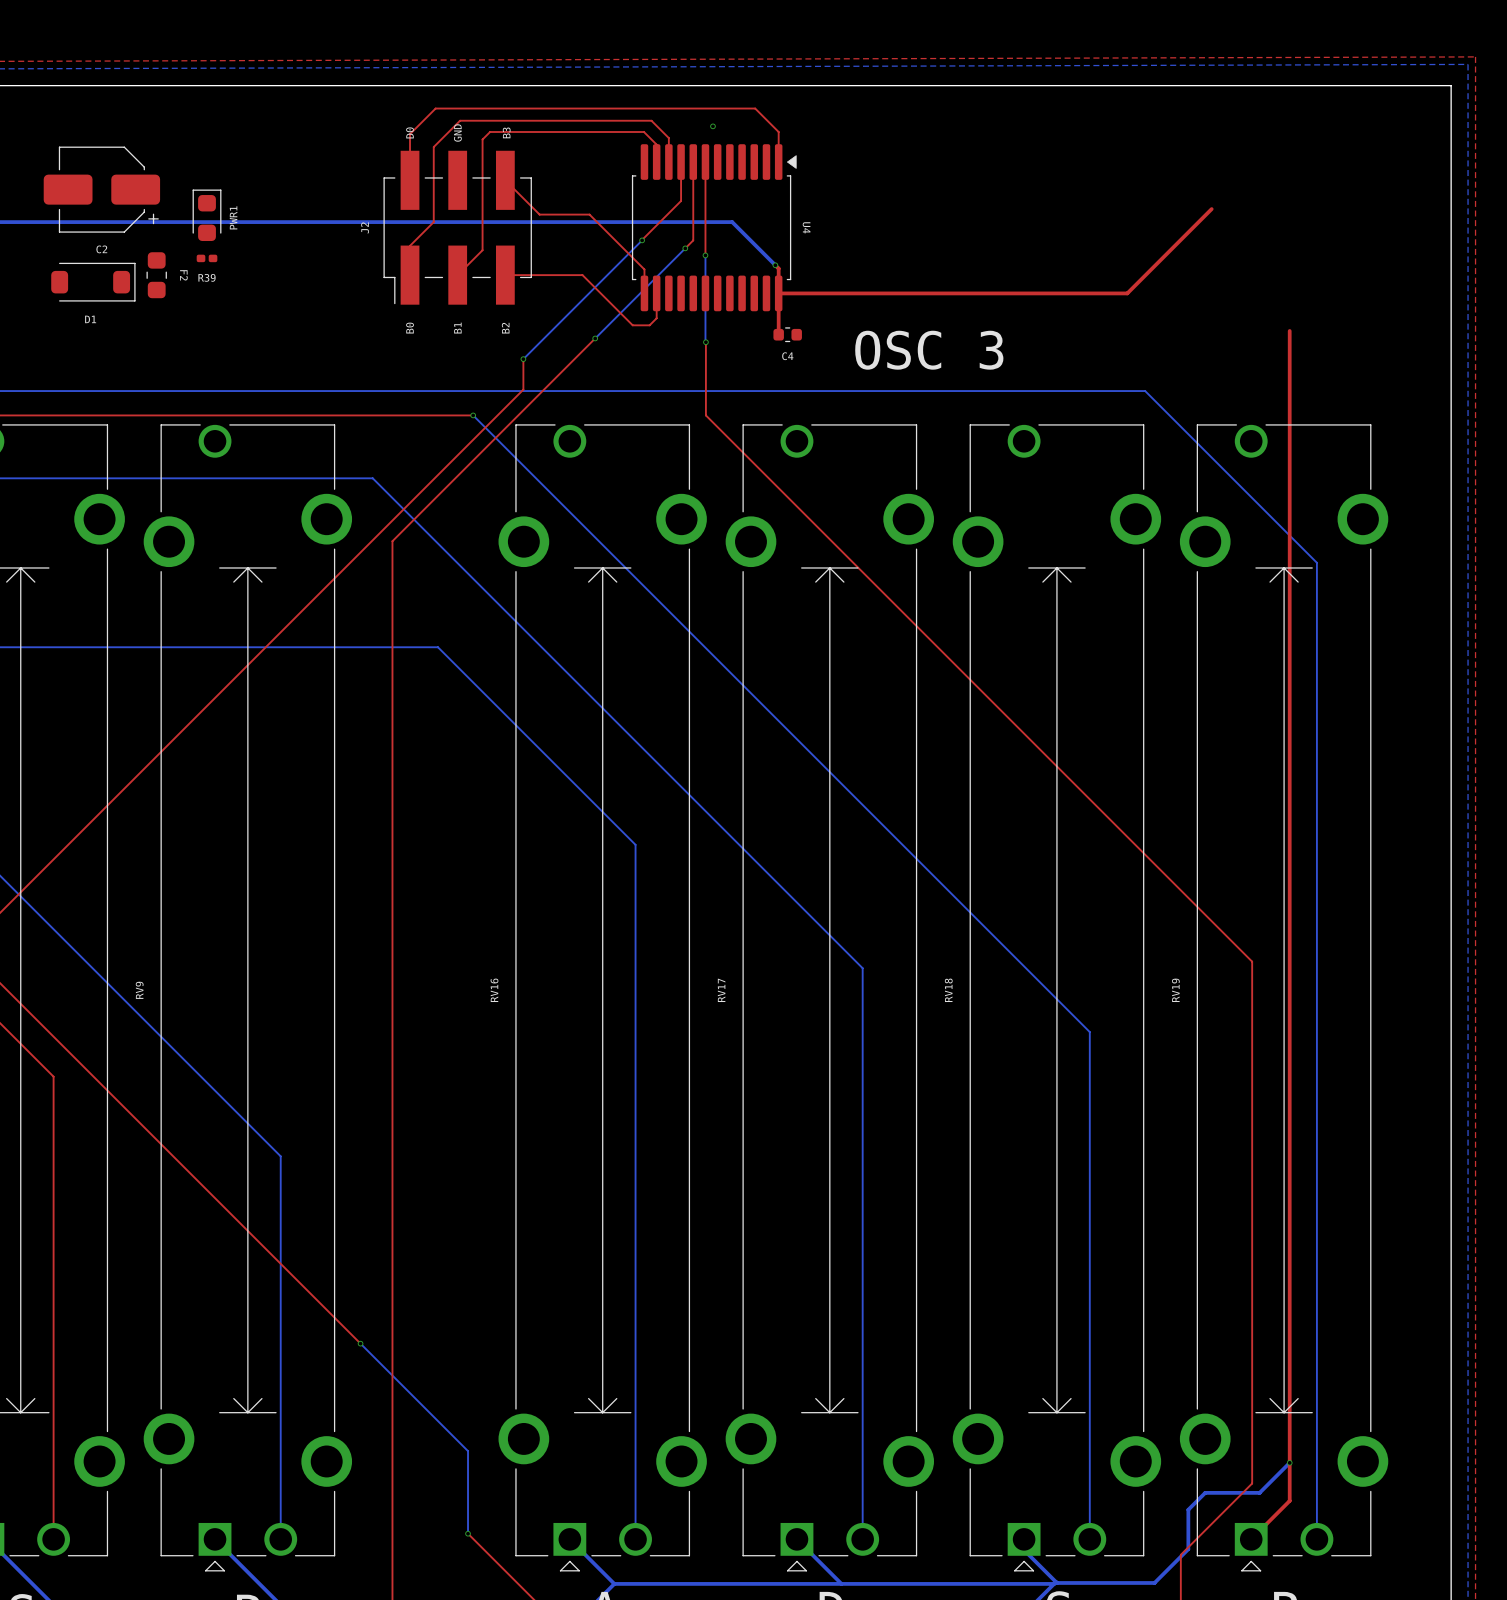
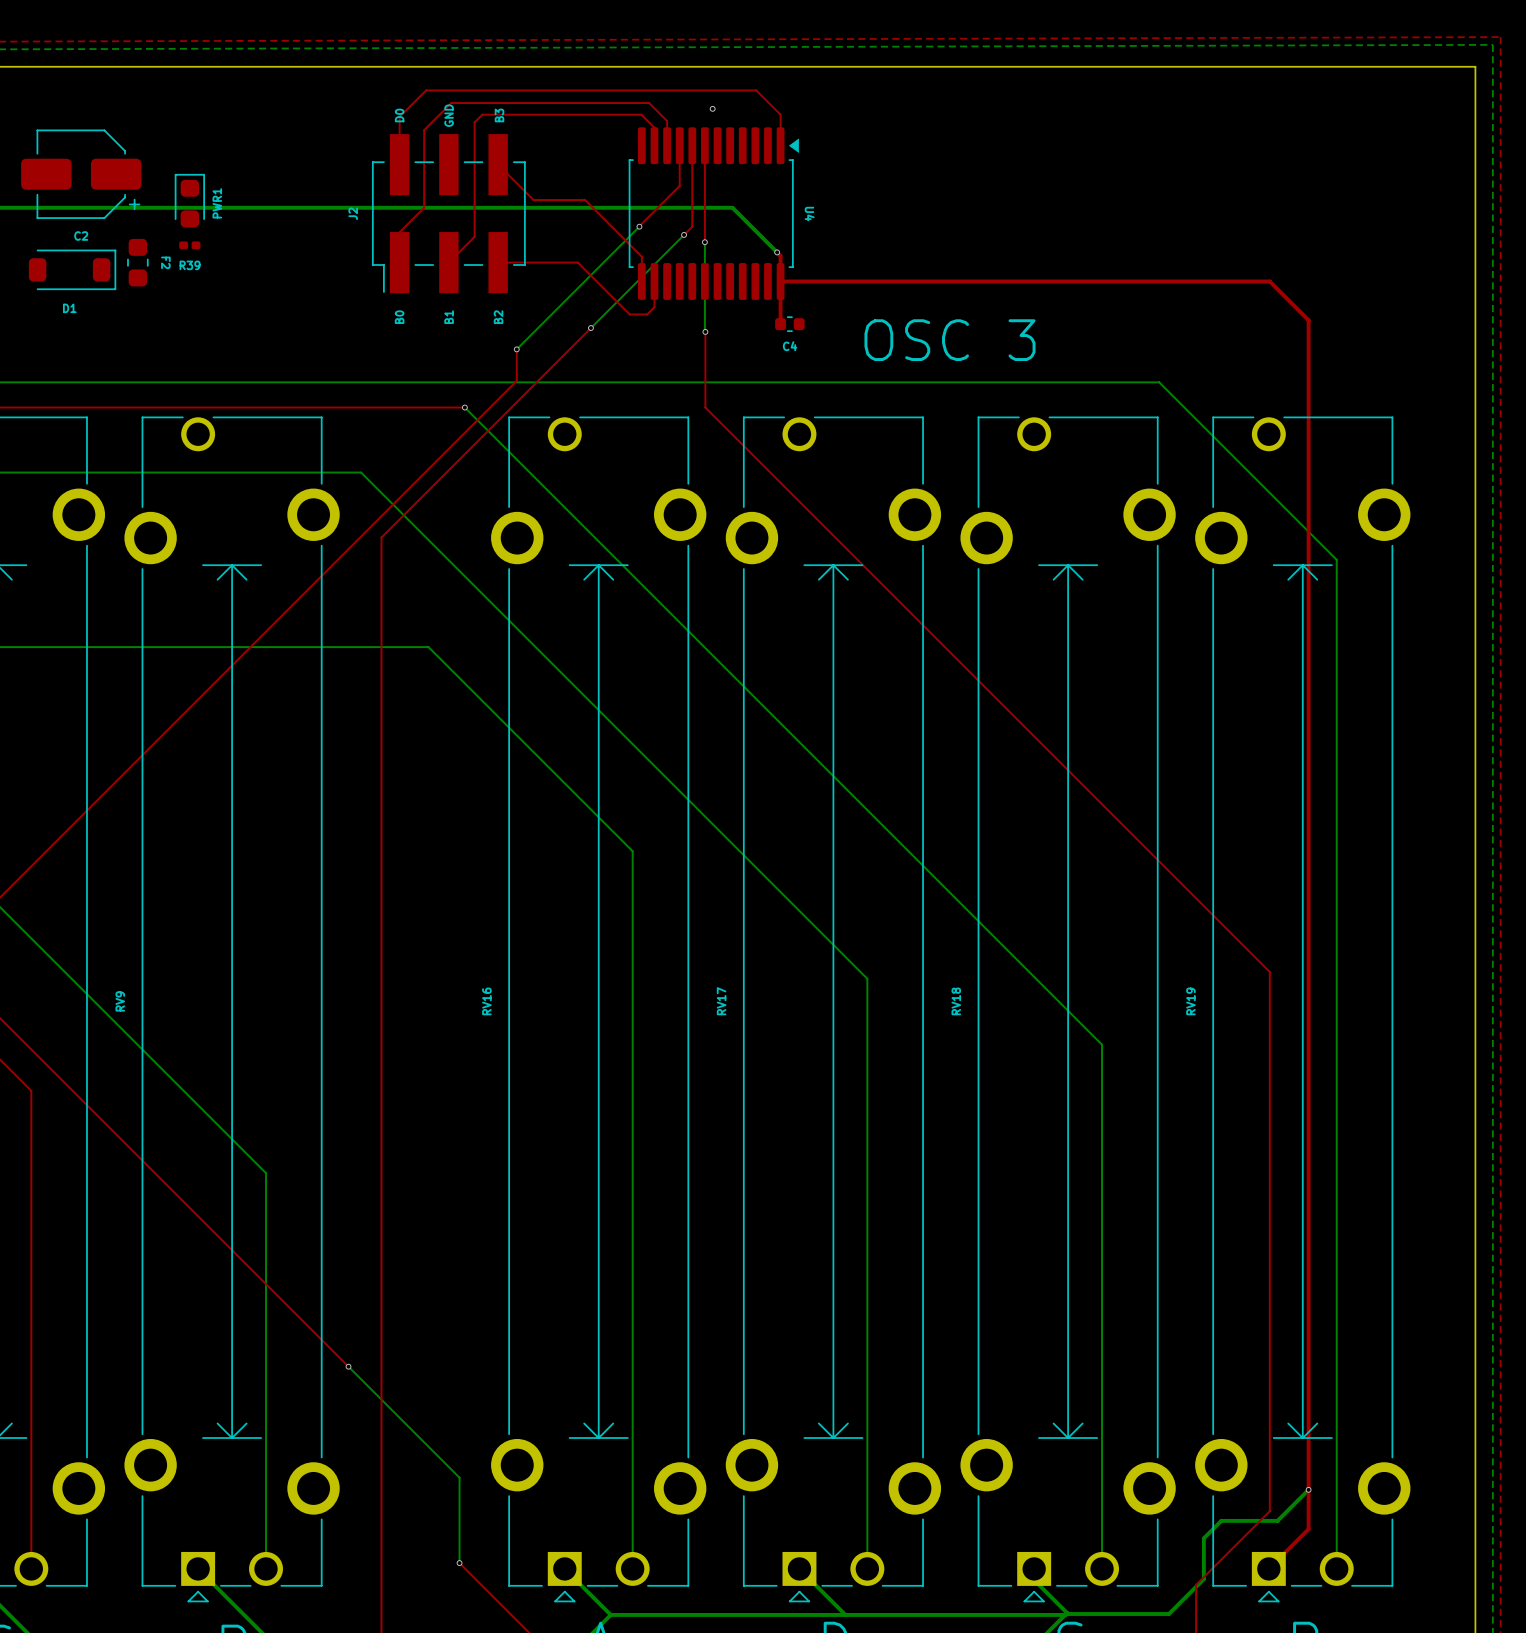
top track: (1211, 209) (1127, 293) -> (1308, 320) (1269, 281) (1140, 281)

